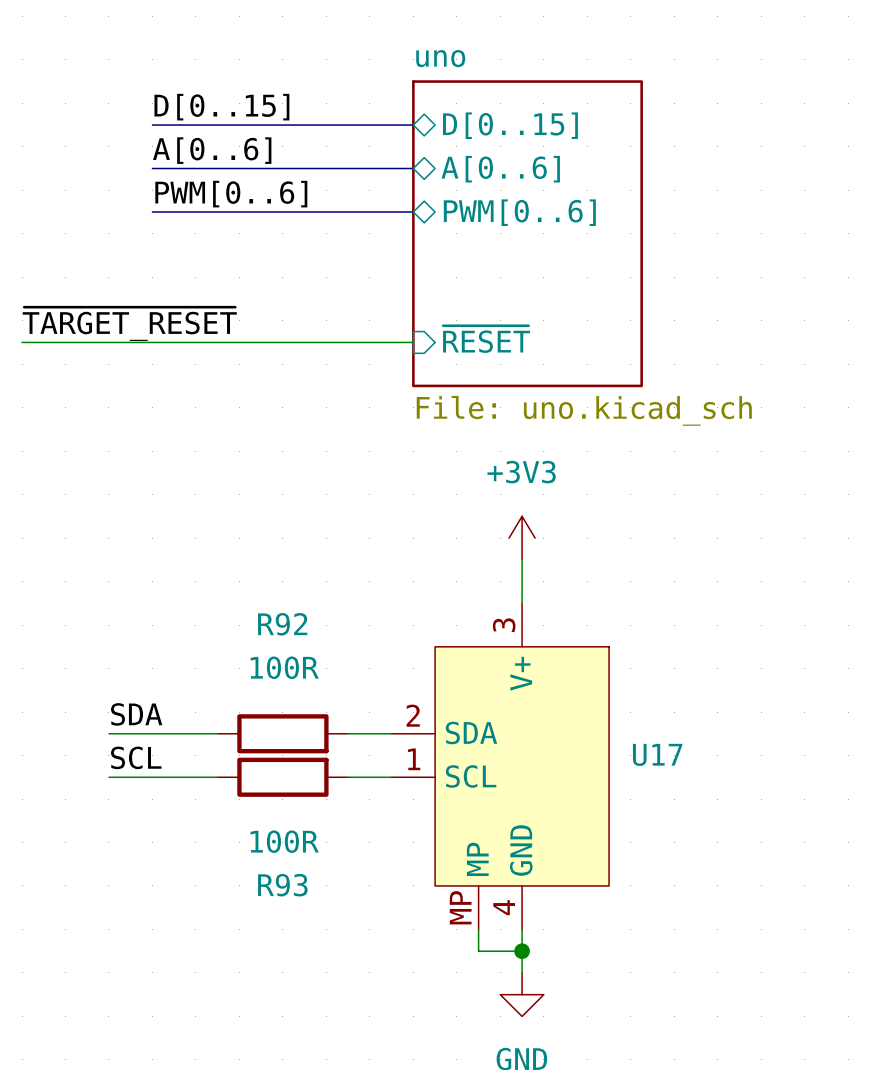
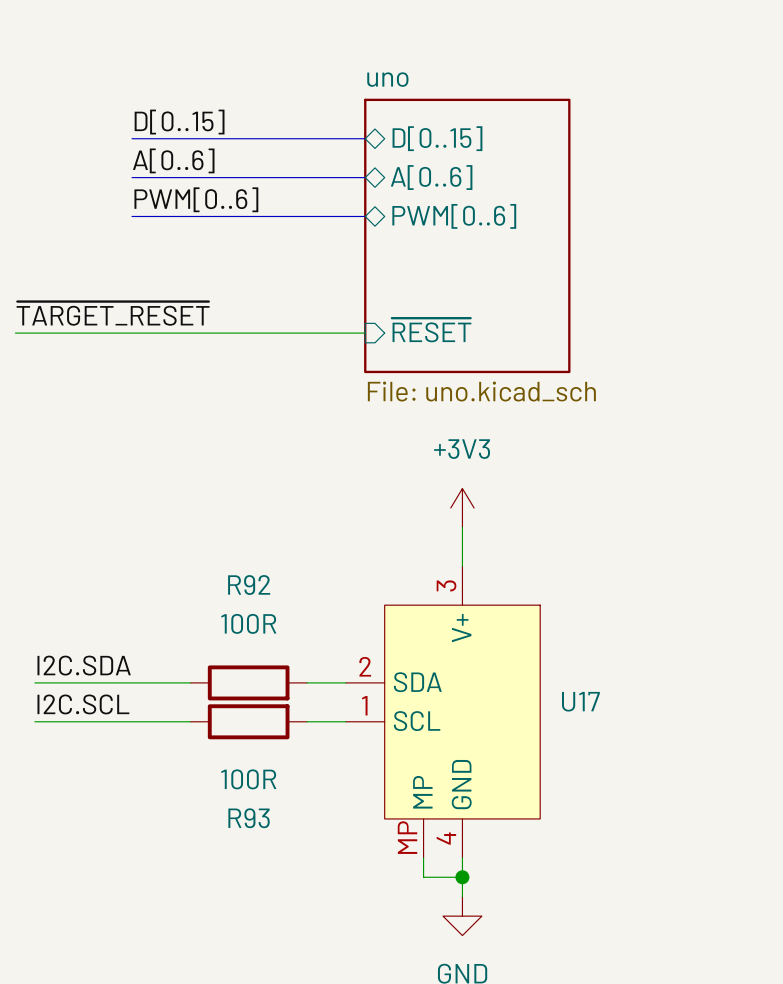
label: none -> I2C.SDA (84, 665)
label: SDA (136, 714) -> none
wire: none -> (34, 682) (93, 682)
label: none -> I2C.SCL (83, 704)
label: SCL (136, 757) -> none
wire: none -> (34, 721) (93, 721)

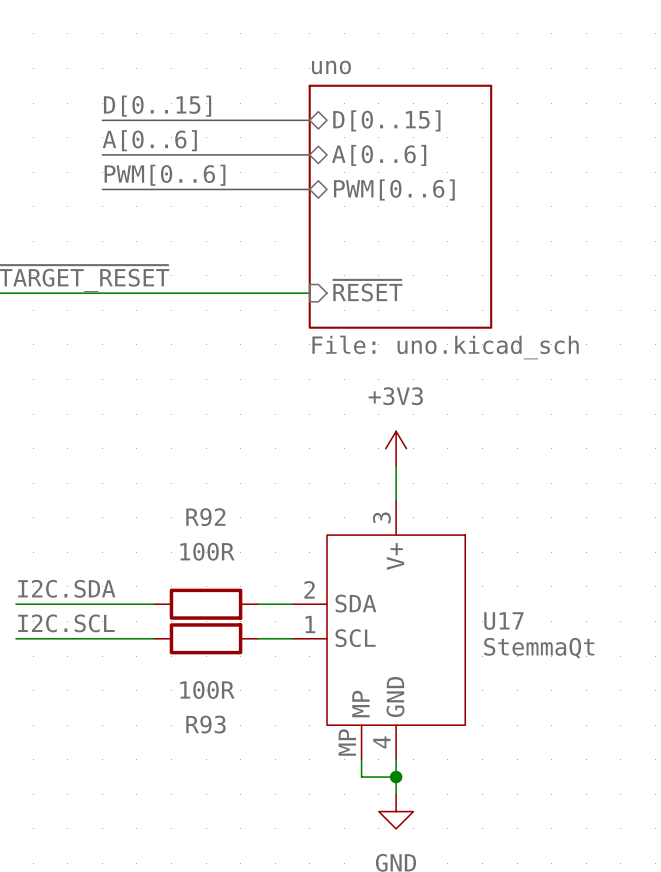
U17 value: none -> StemmaQt (539, 648)

